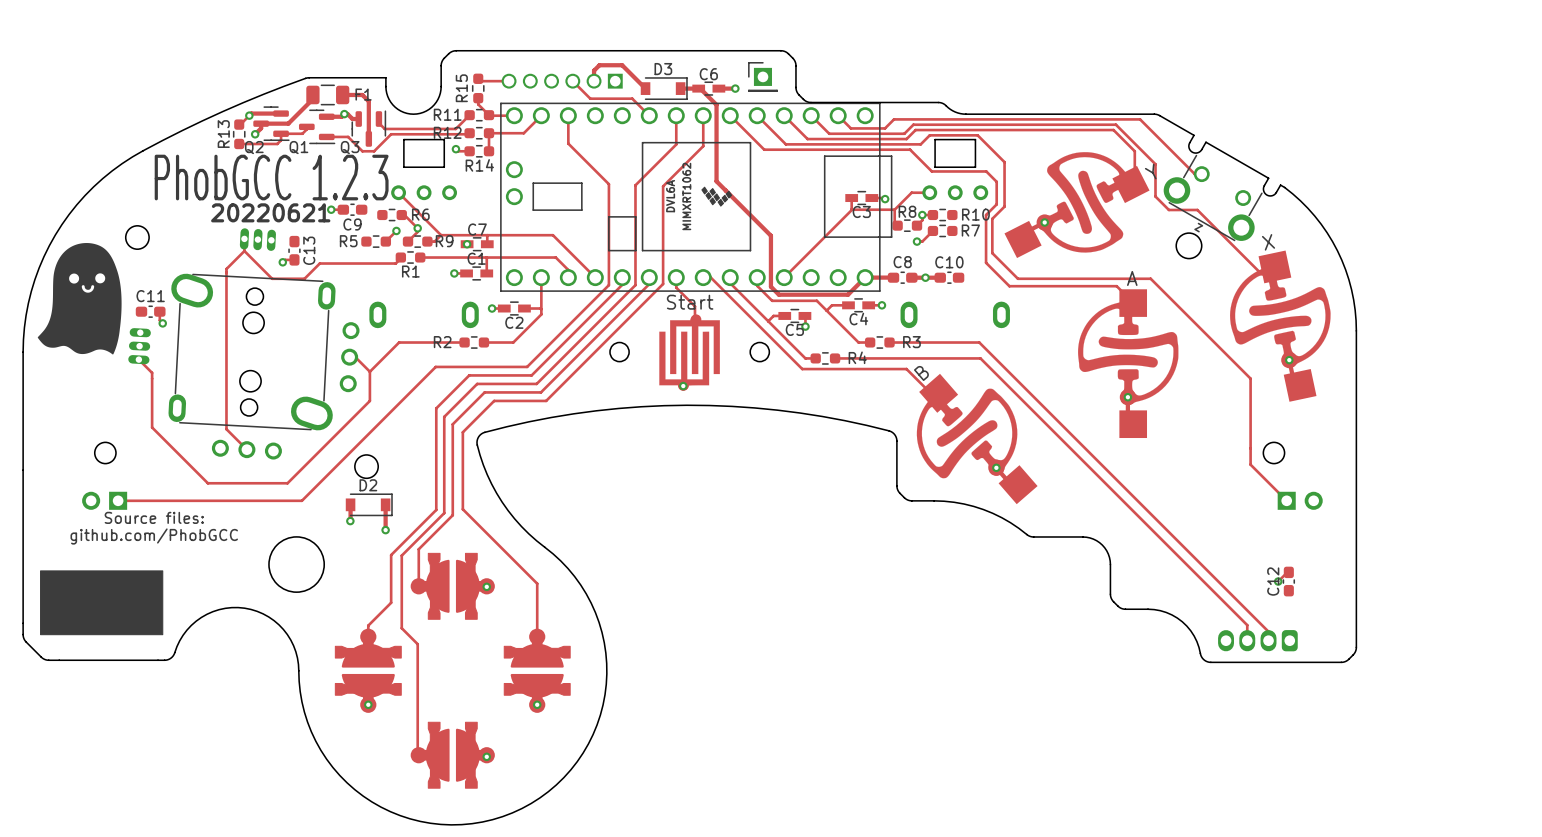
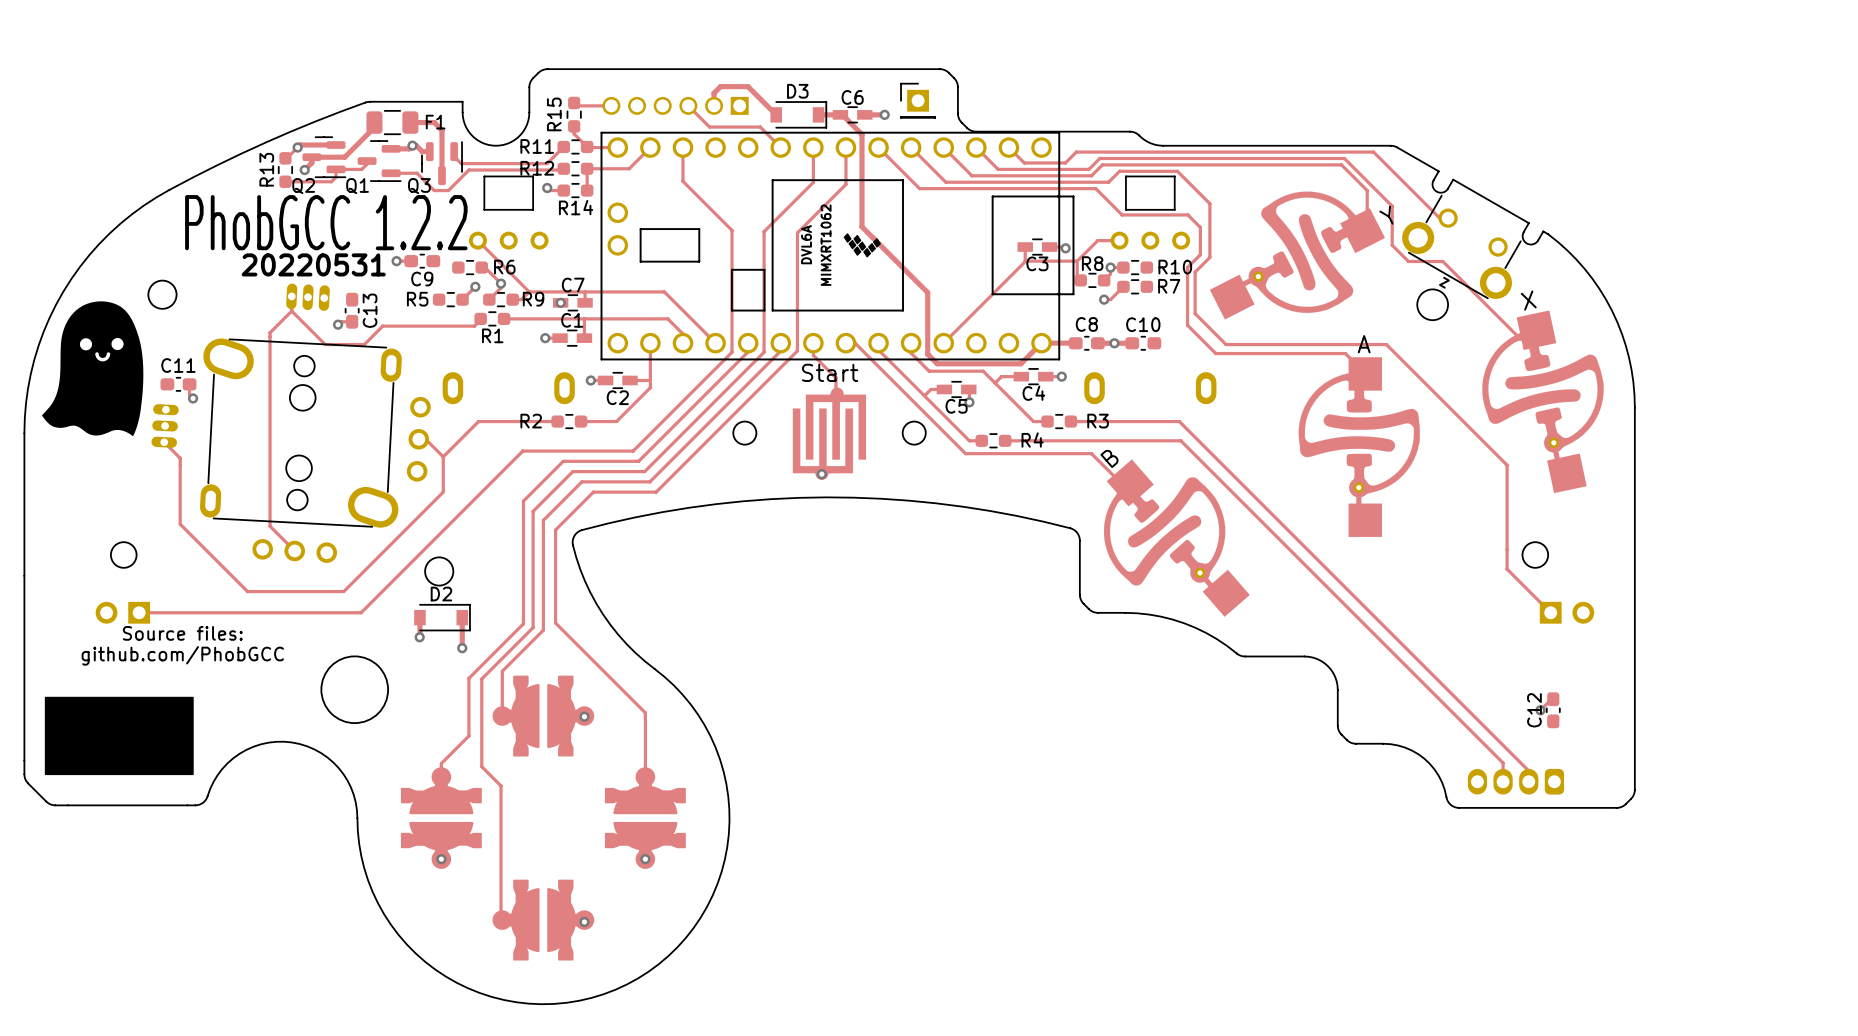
text: PhobGCC 1.2.3 (271, 177) -> PhobGCC 1.2.2 (326, 222)
text: 20220621 (270, 212) -> 20220531 (313, 264)

